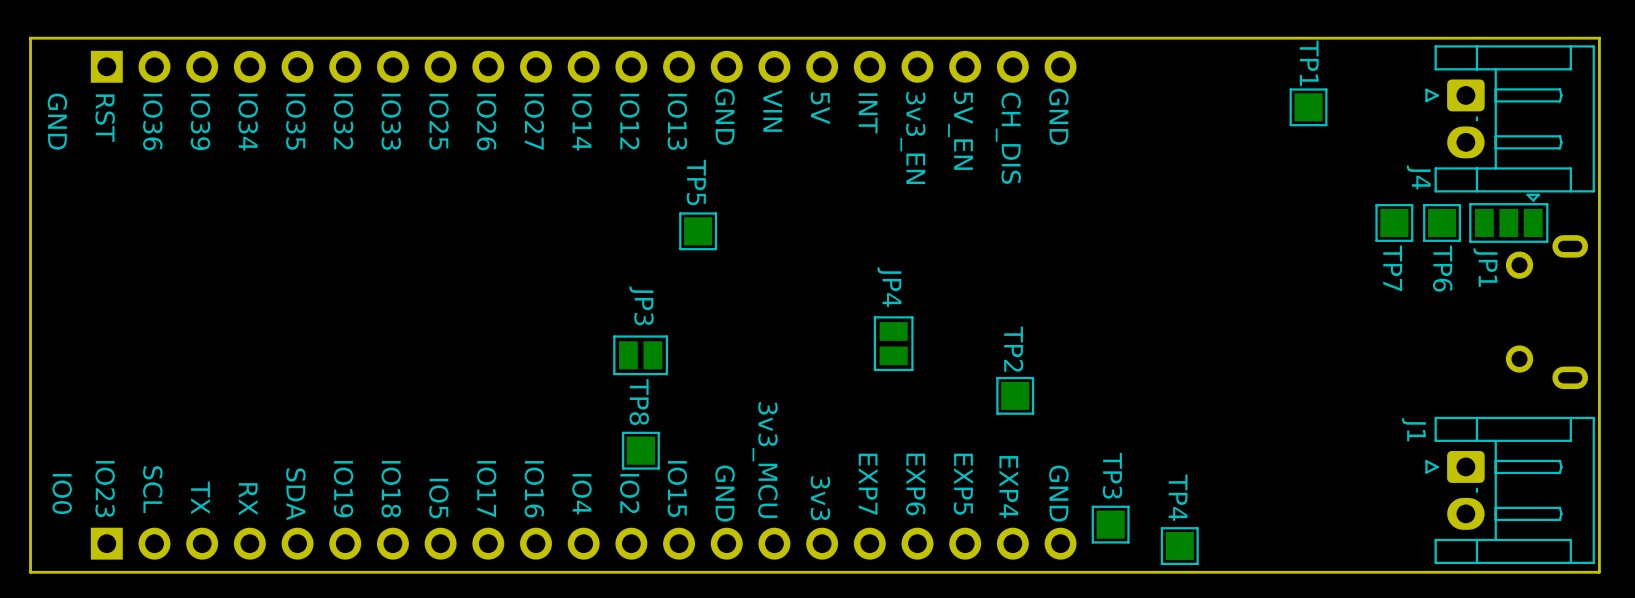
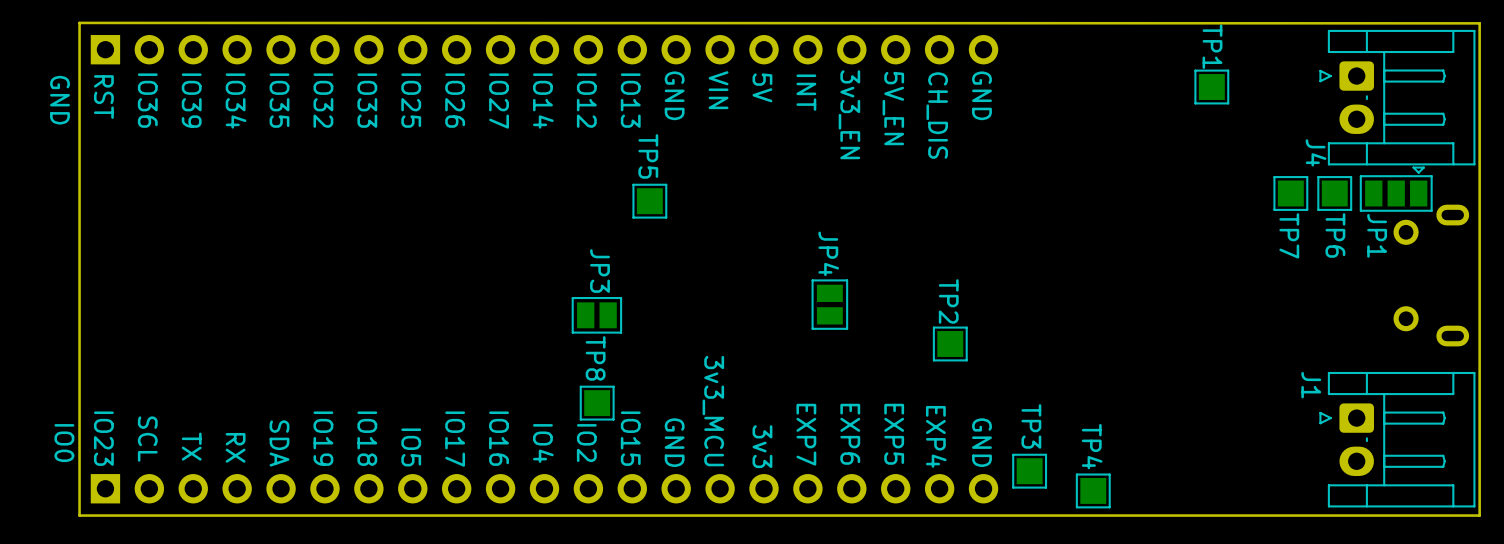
board edge: (1599, 38) (30, 38) (30, 572) (1599, 572) -> (1479, 23) (79, 22) (79, 515) (1479, 515)
TP2 position: (1015, 395) -> (950, 344)

